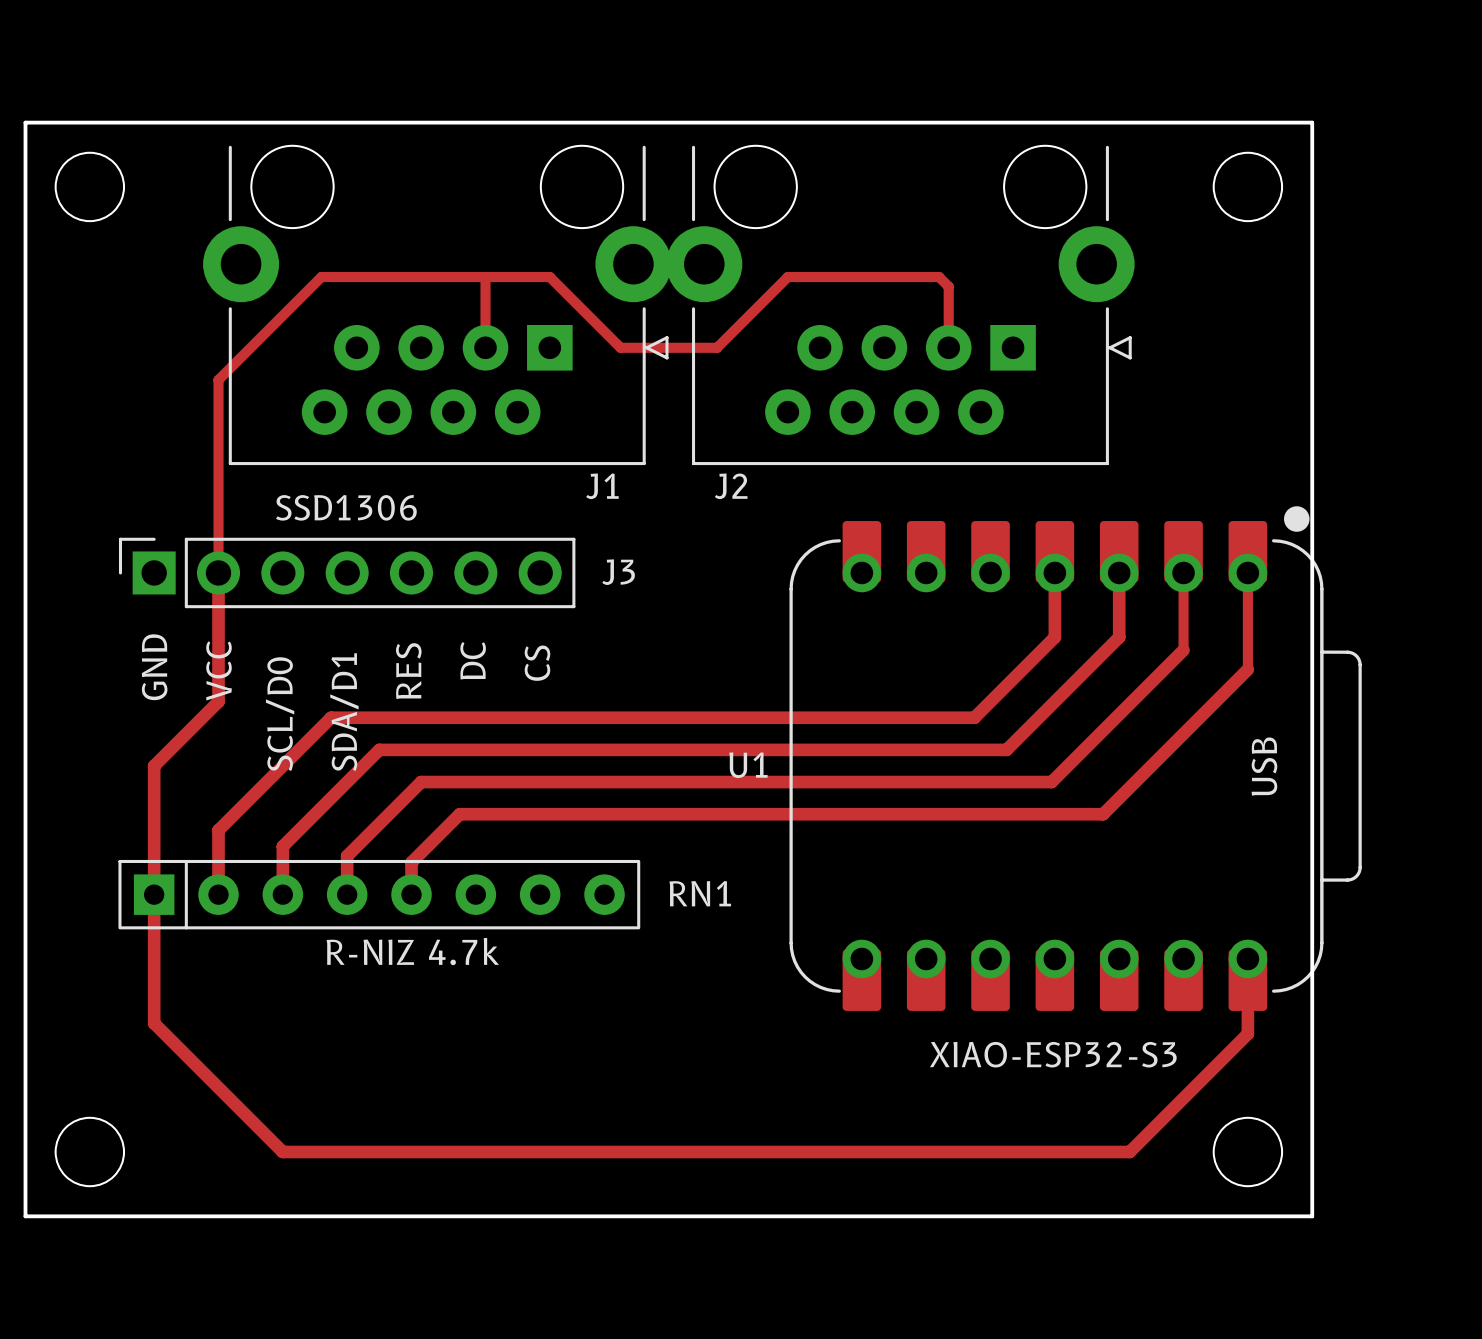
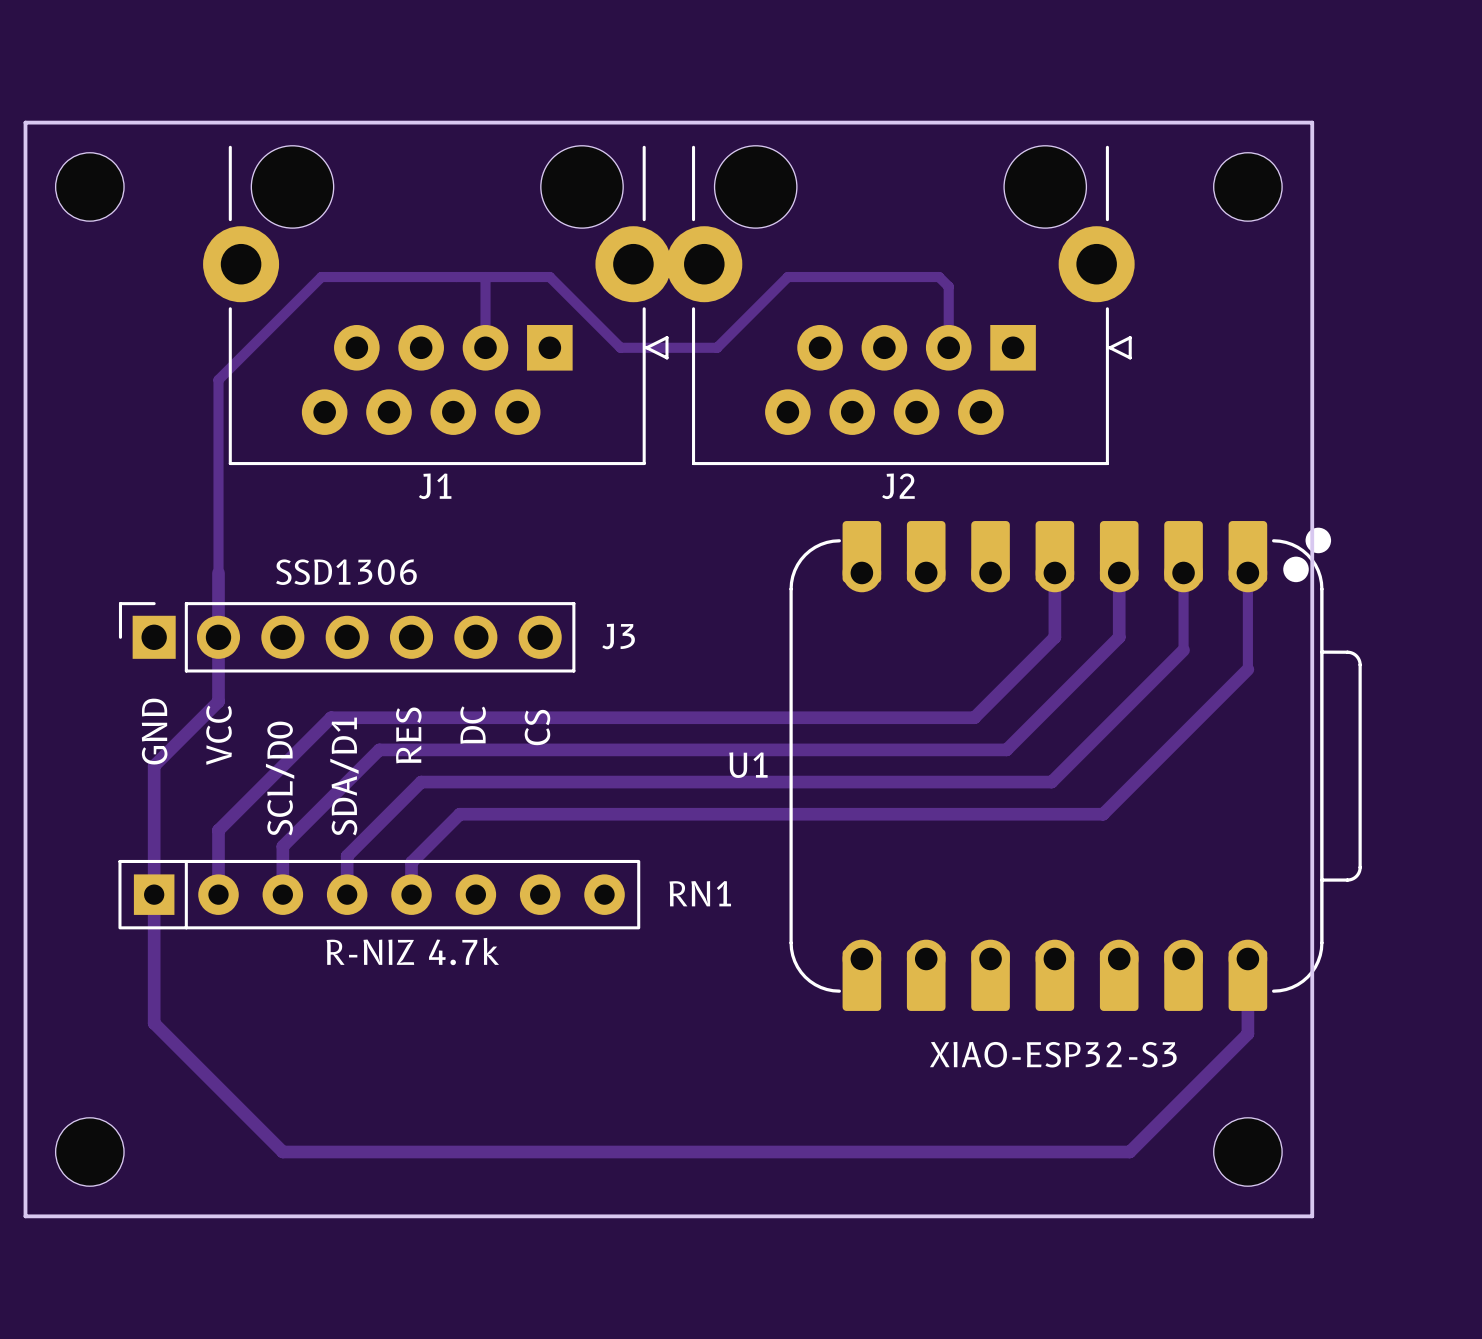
J1 name position: J1 (602, 486) -> J1 (435, 486)
J2 name position: J2 (731, 486) -> J2 (898, 486)
U1 footprint: [789, 506, 1362, 1011] -> [789, 521, 1362, 1011]
J3 position: (347, 572) -> (347, 637)
text position: DC (473, 660) -> DC (473, 725)
text position: CS (537, 663) -> CS (537, 727)
text position: GND (154, 667) -> GND (154, 731)
text position: VCC (218, 670) -> VCC (218, 735)
text position: RES (408, 671) -> RES (408, 735)
text position: SDA/D1 (344, 712) -> SDA/D1 (344, 776)
text position: SCL/D0 (280, 714) -> SCL/D0 (280, 778)
text: USB (1264, 766) -> none

